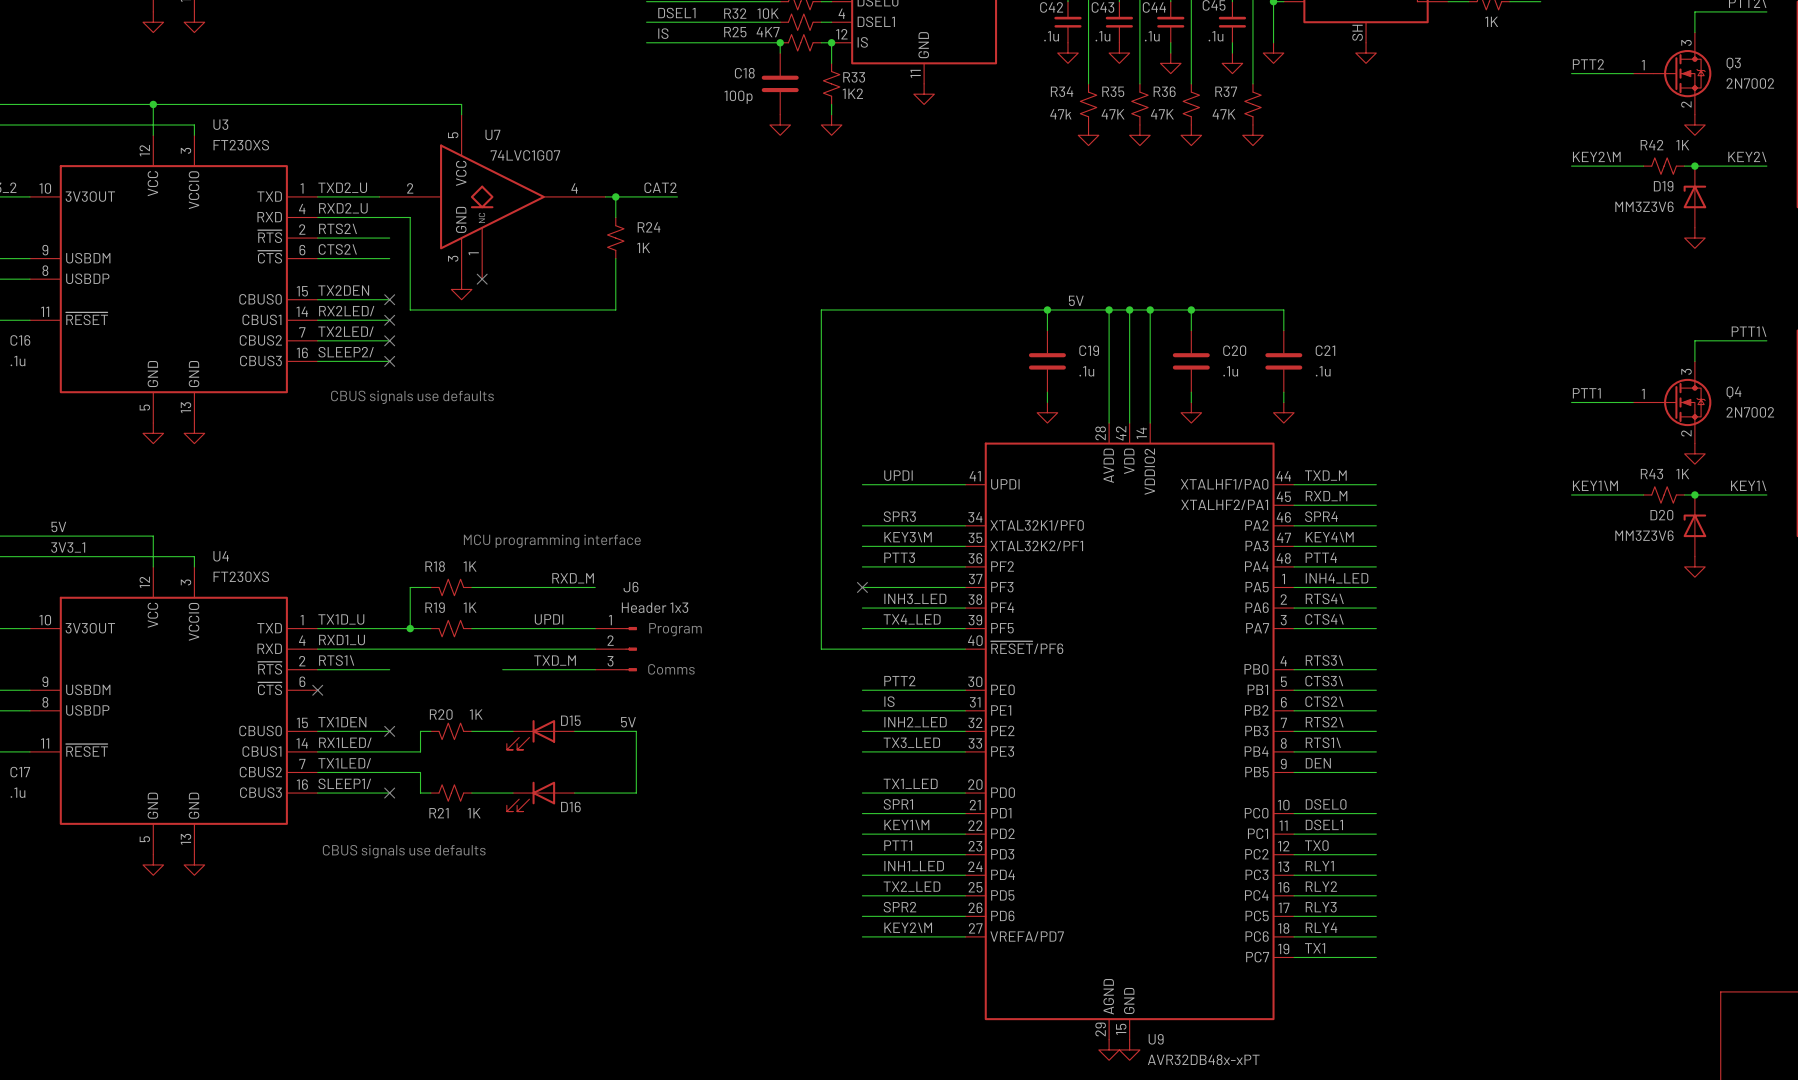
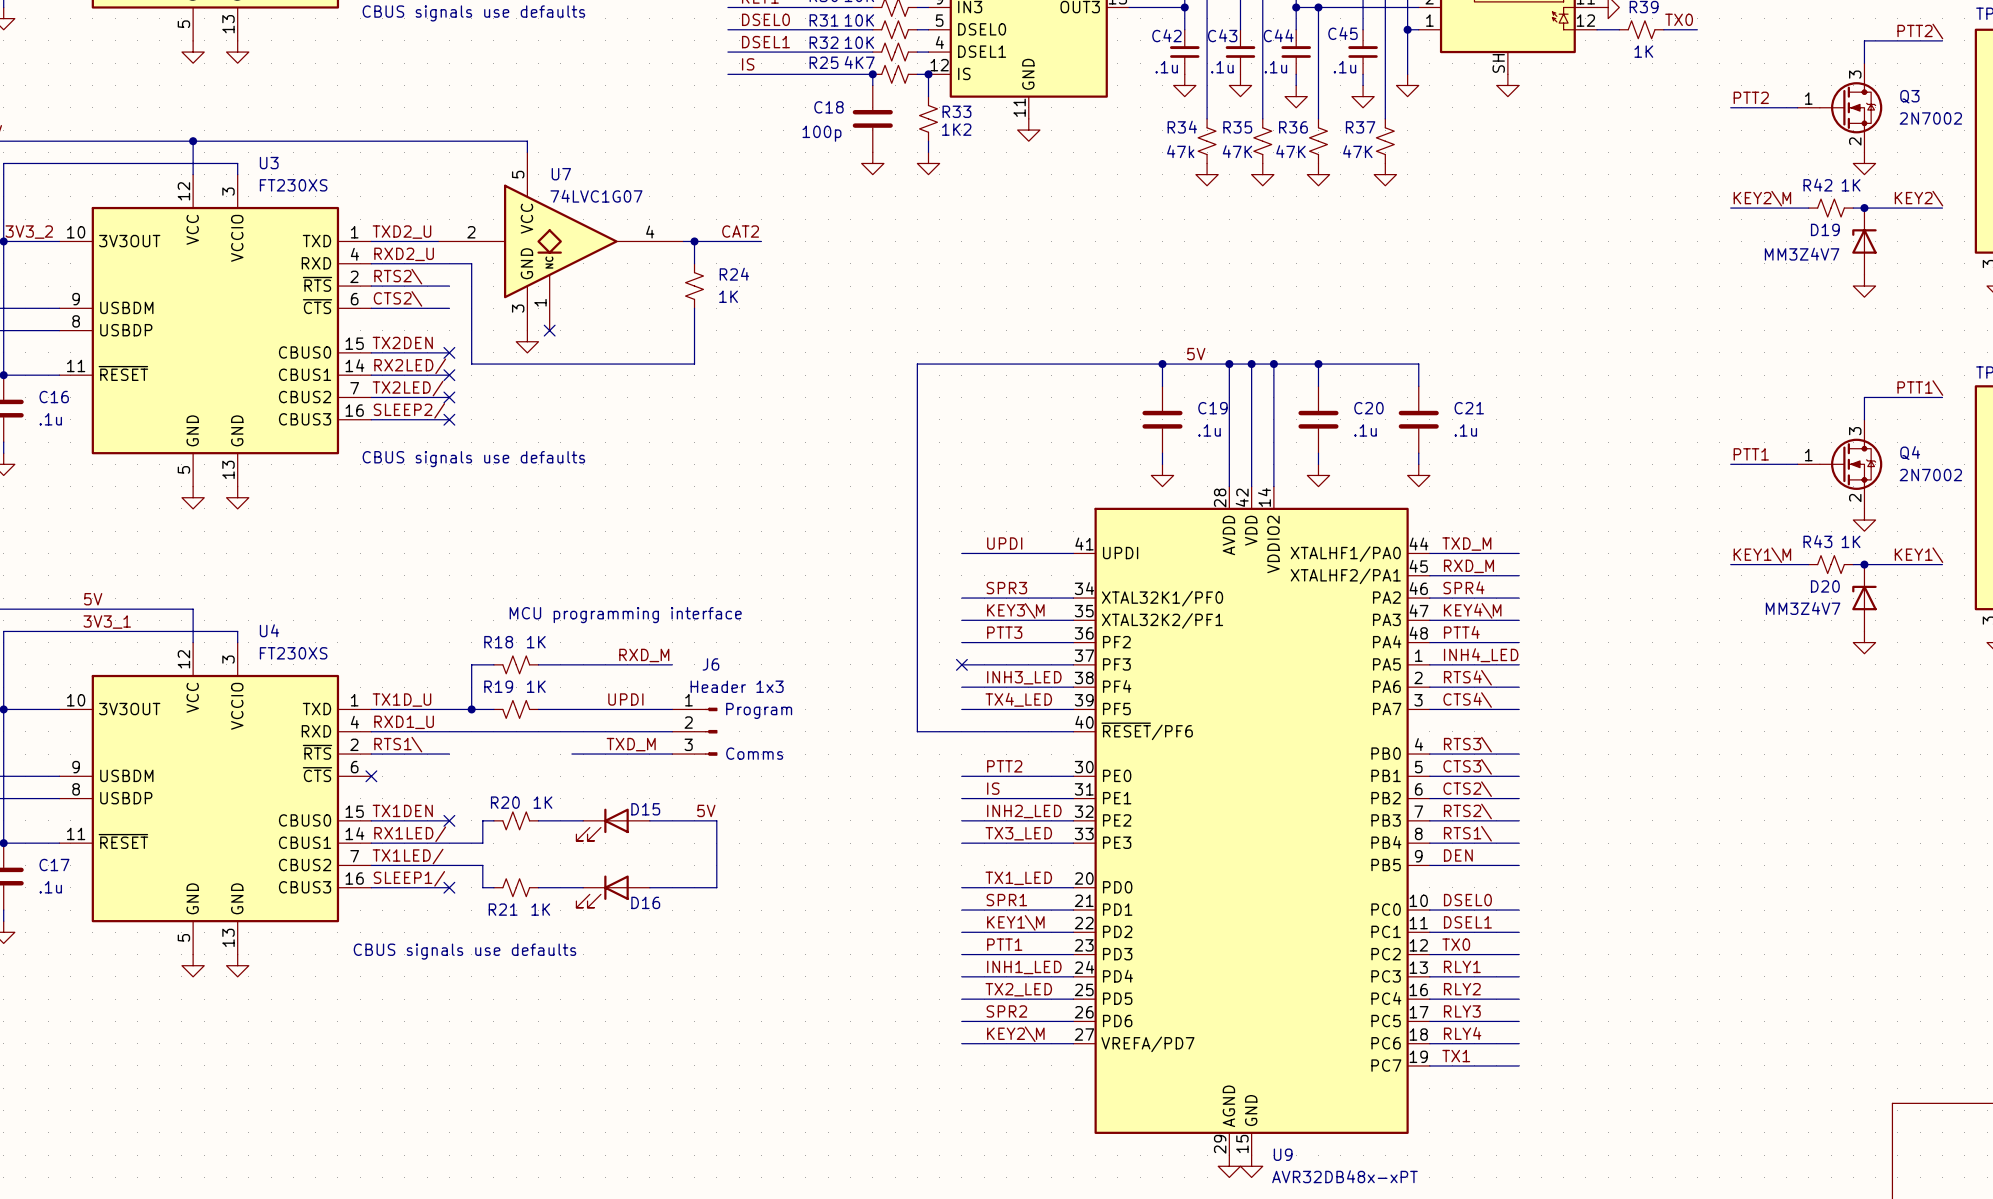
D19 value: MM3Z3V6 (1644, 206) -> MM3Z4V7 (1802, 254)
D20 value: MM3Z3V6 (1644, 535) -> MM3Z4V7 (1803, 608)

